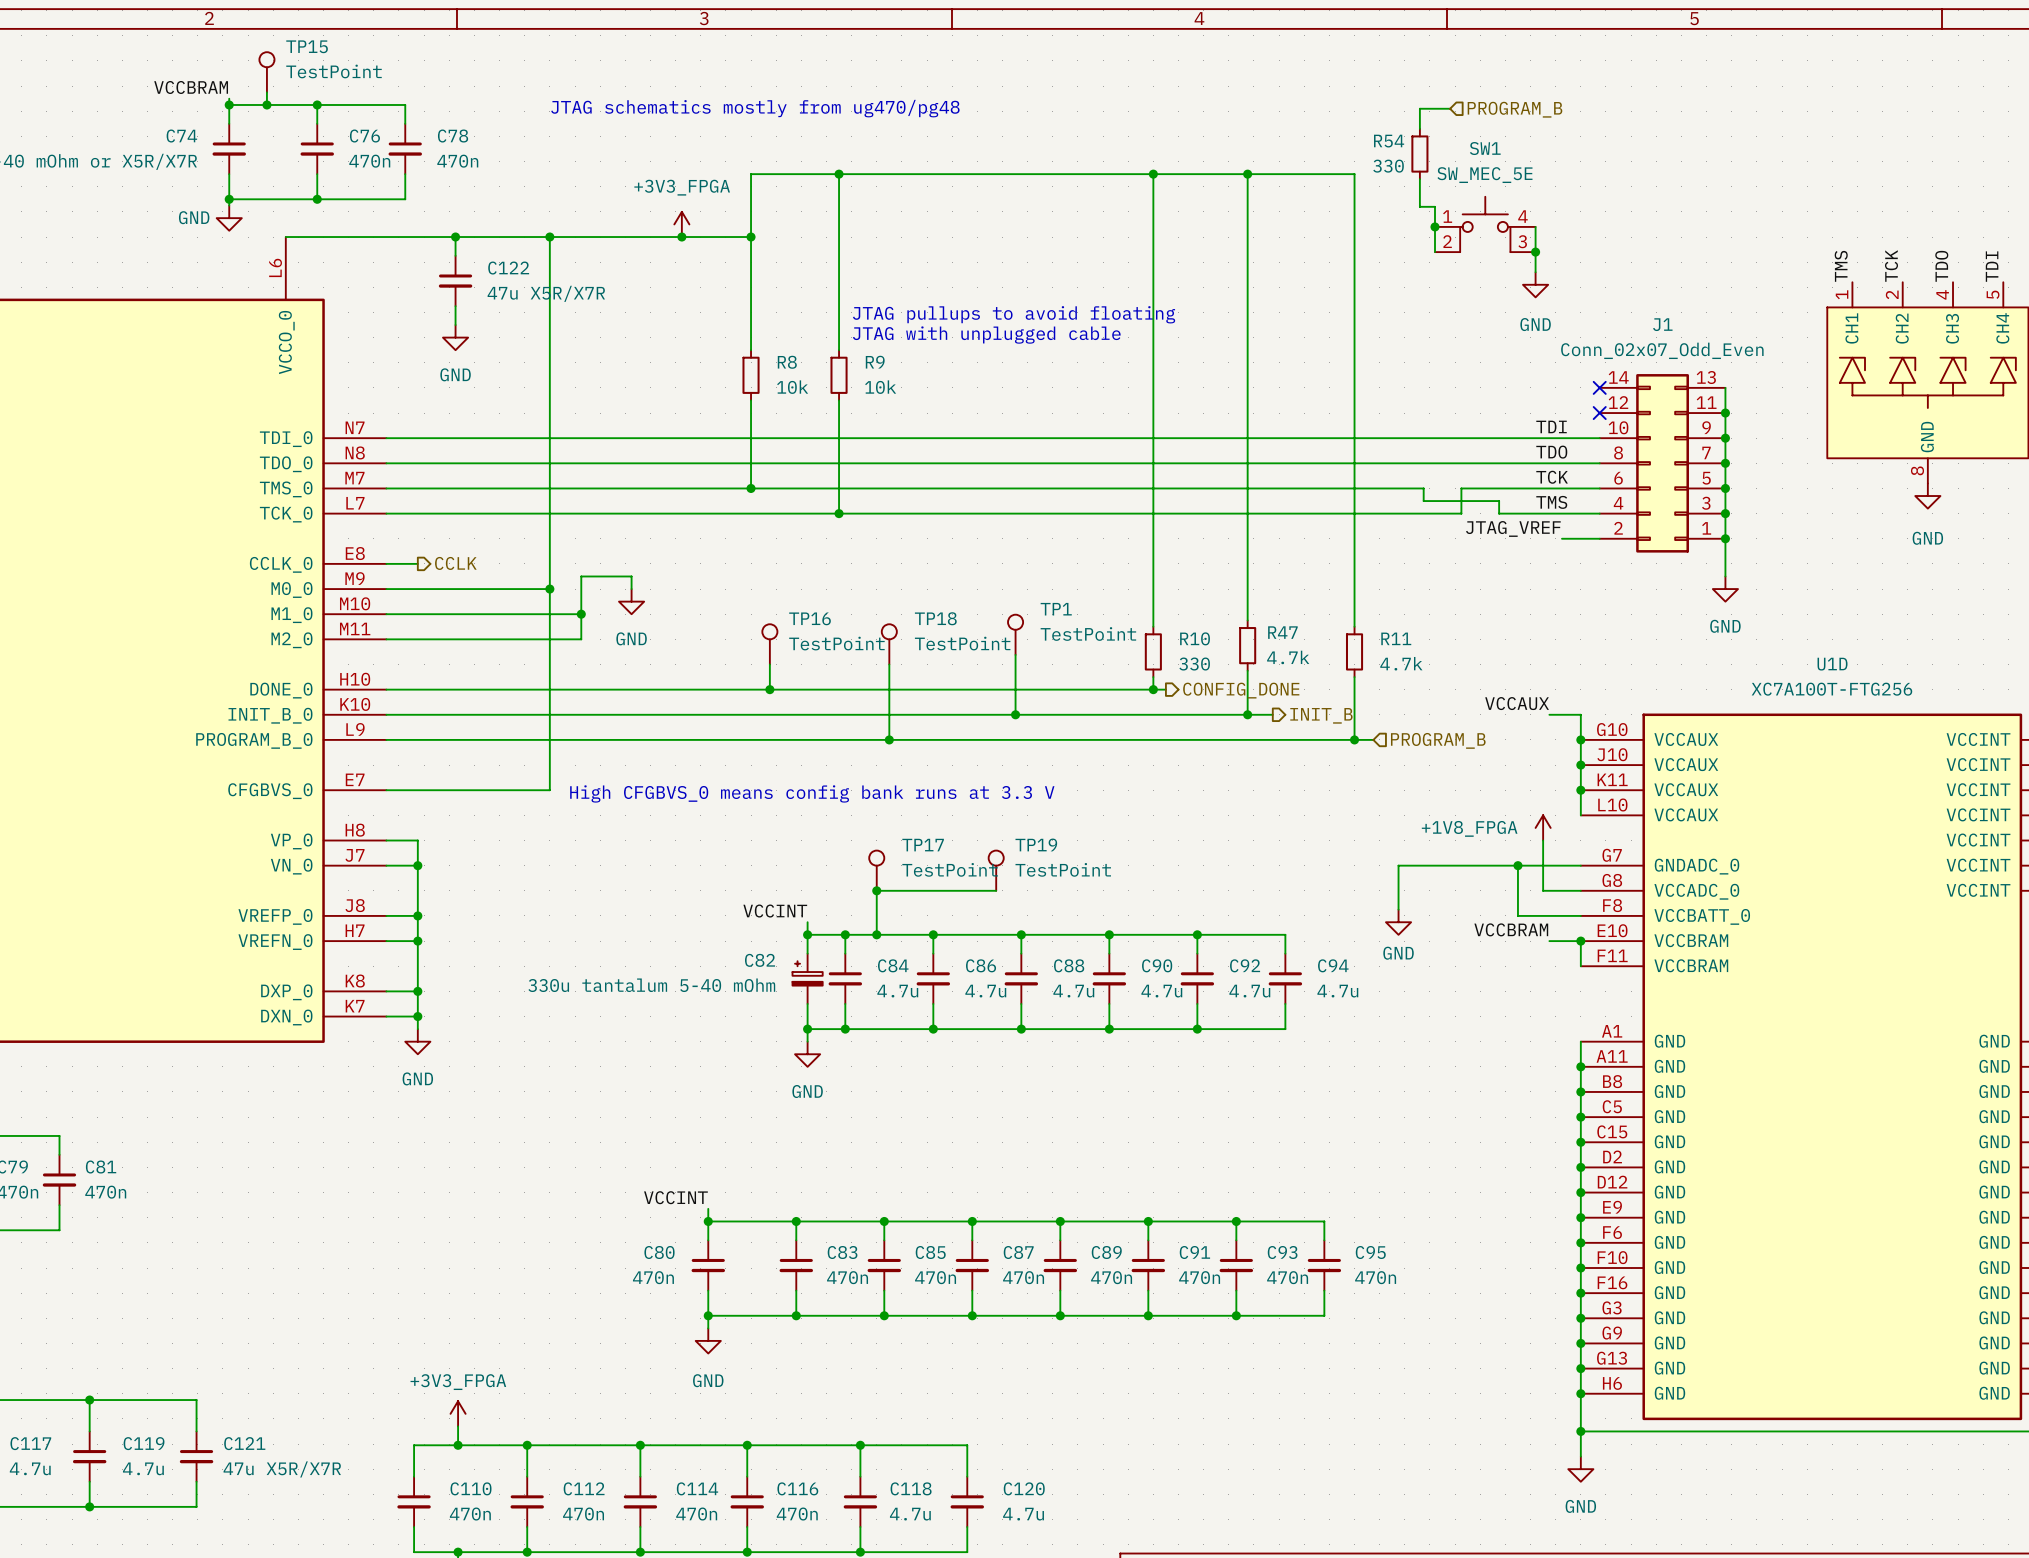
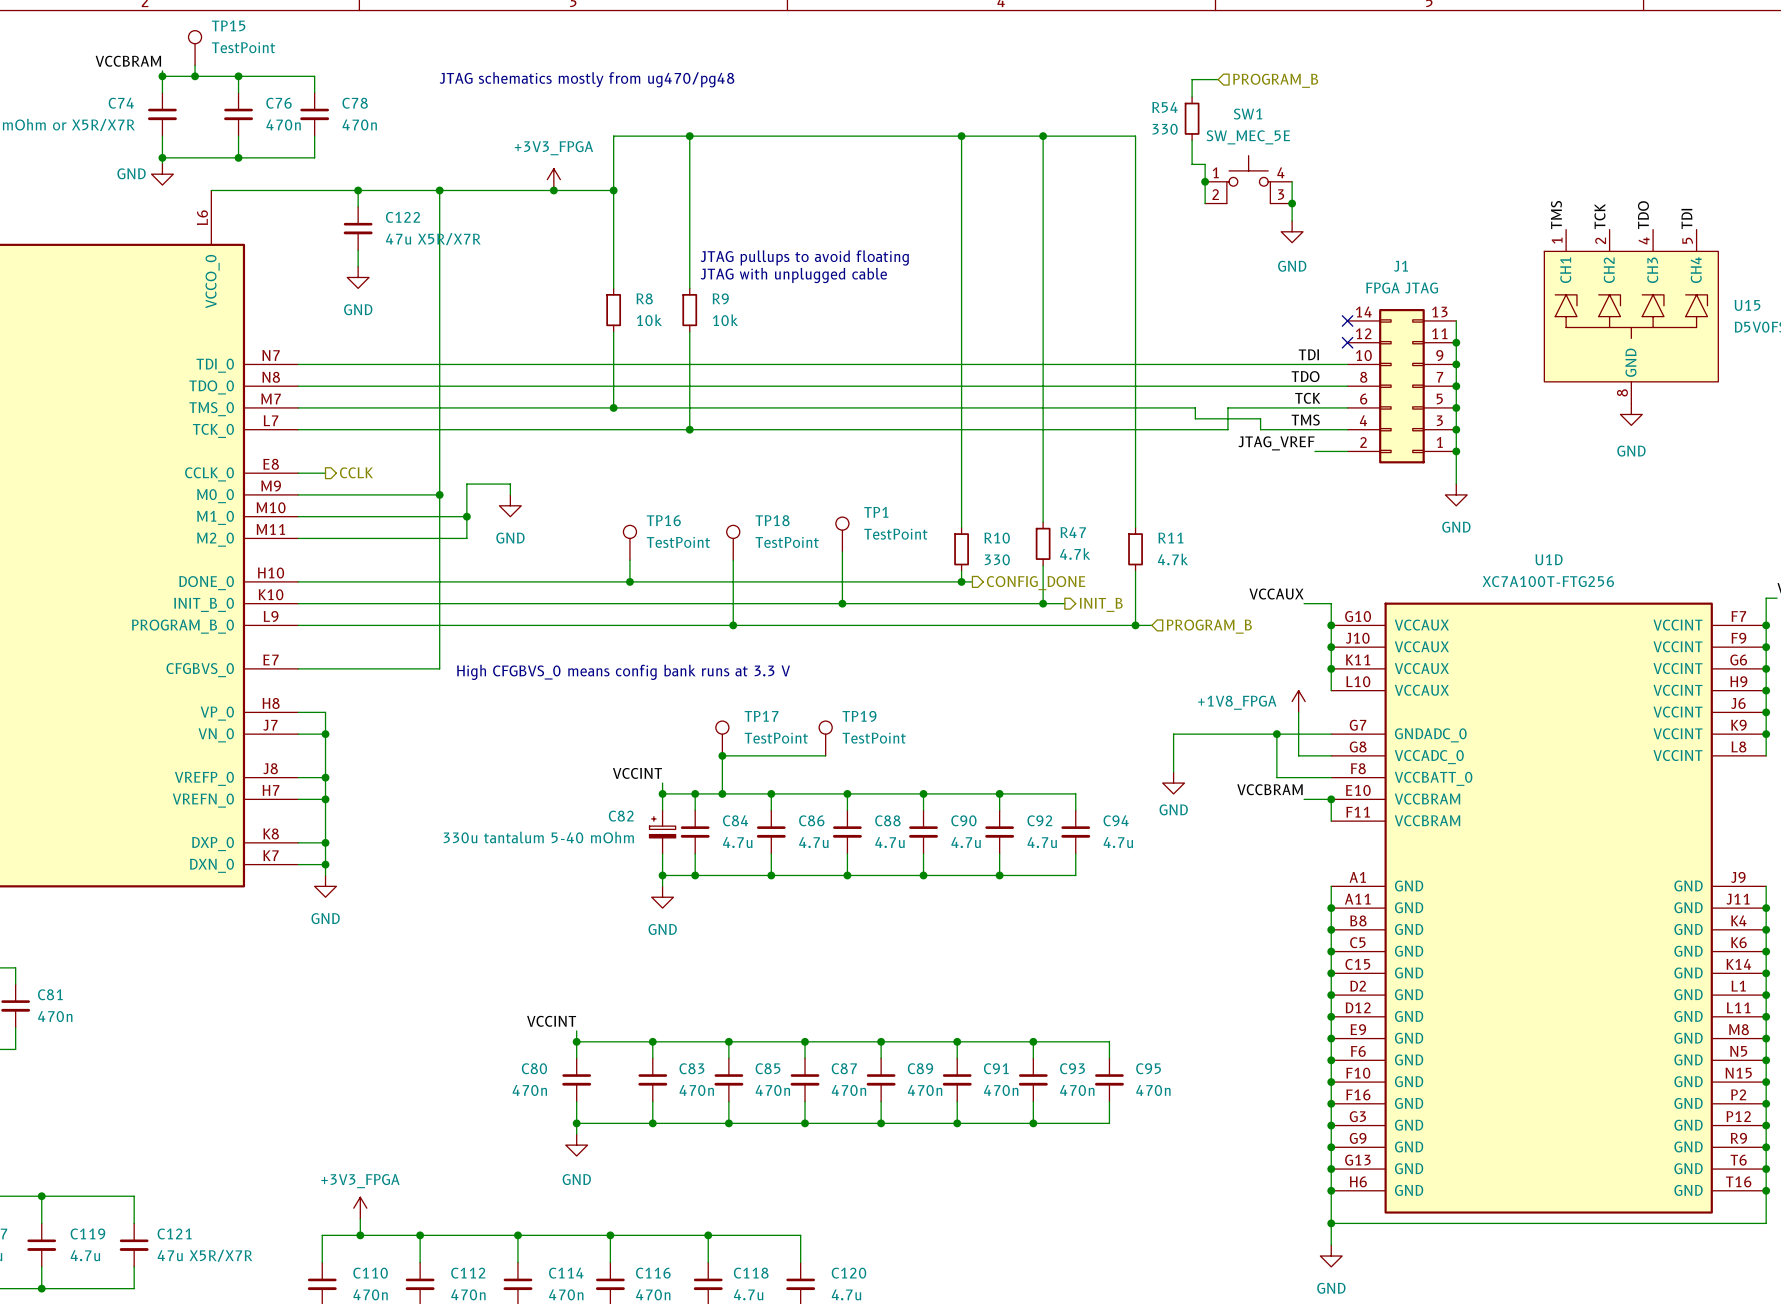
J1 value: Conn_02x07_Odd_Even (1662, 350) -> FPGA JTAG (1402, 288)

